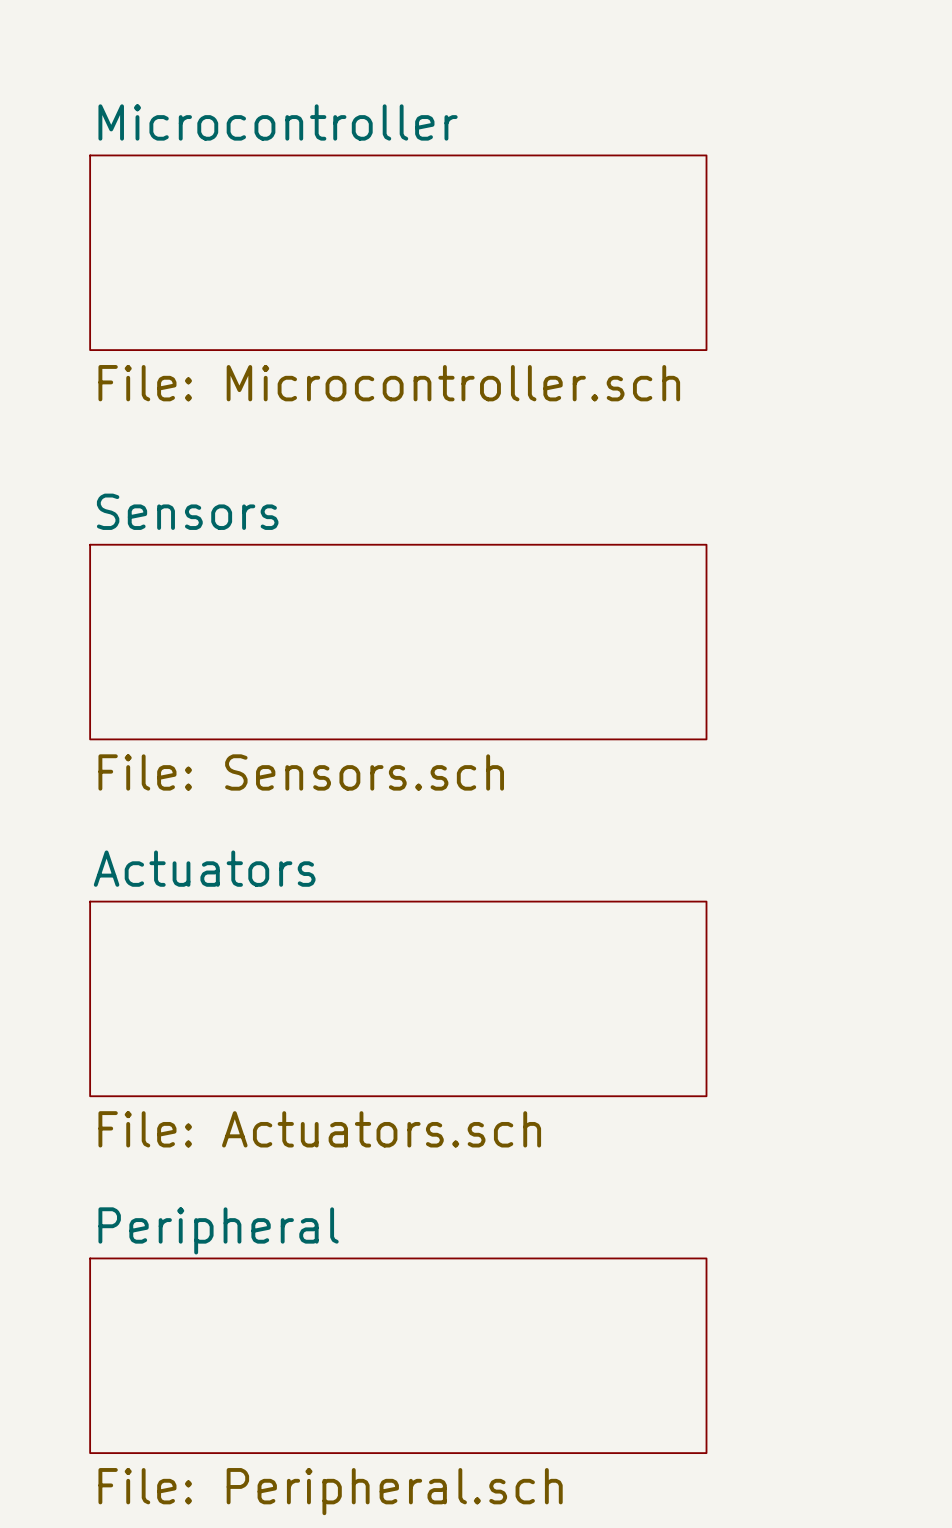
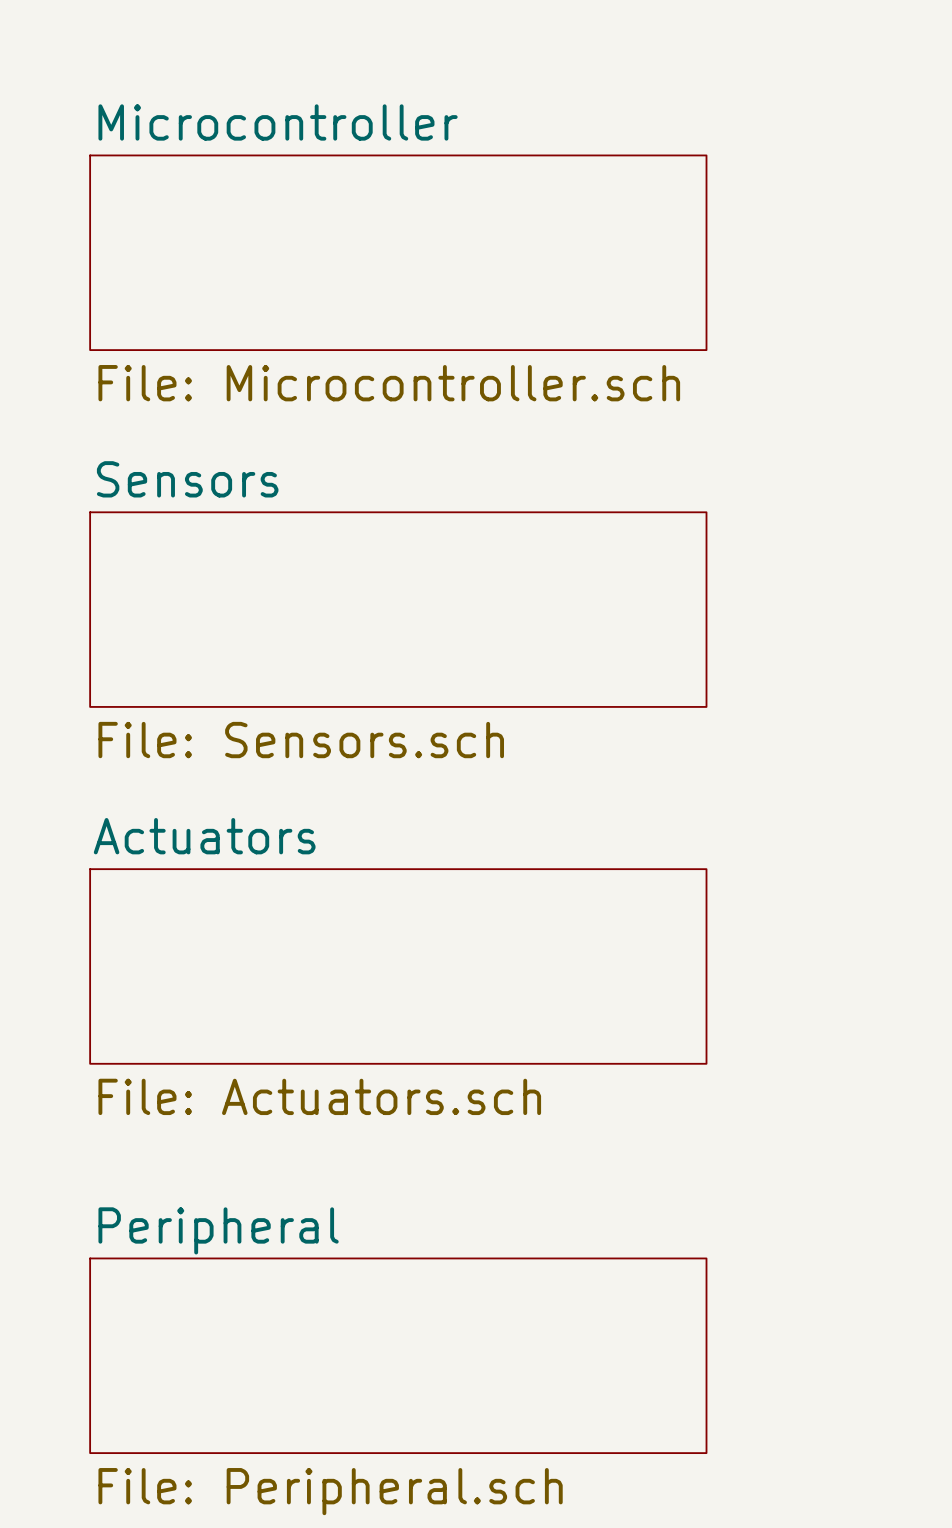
sheet Sensors position: (398, 642) -> (398, 609)
sheet Actuators position: (398, 998) -> (398, 966)

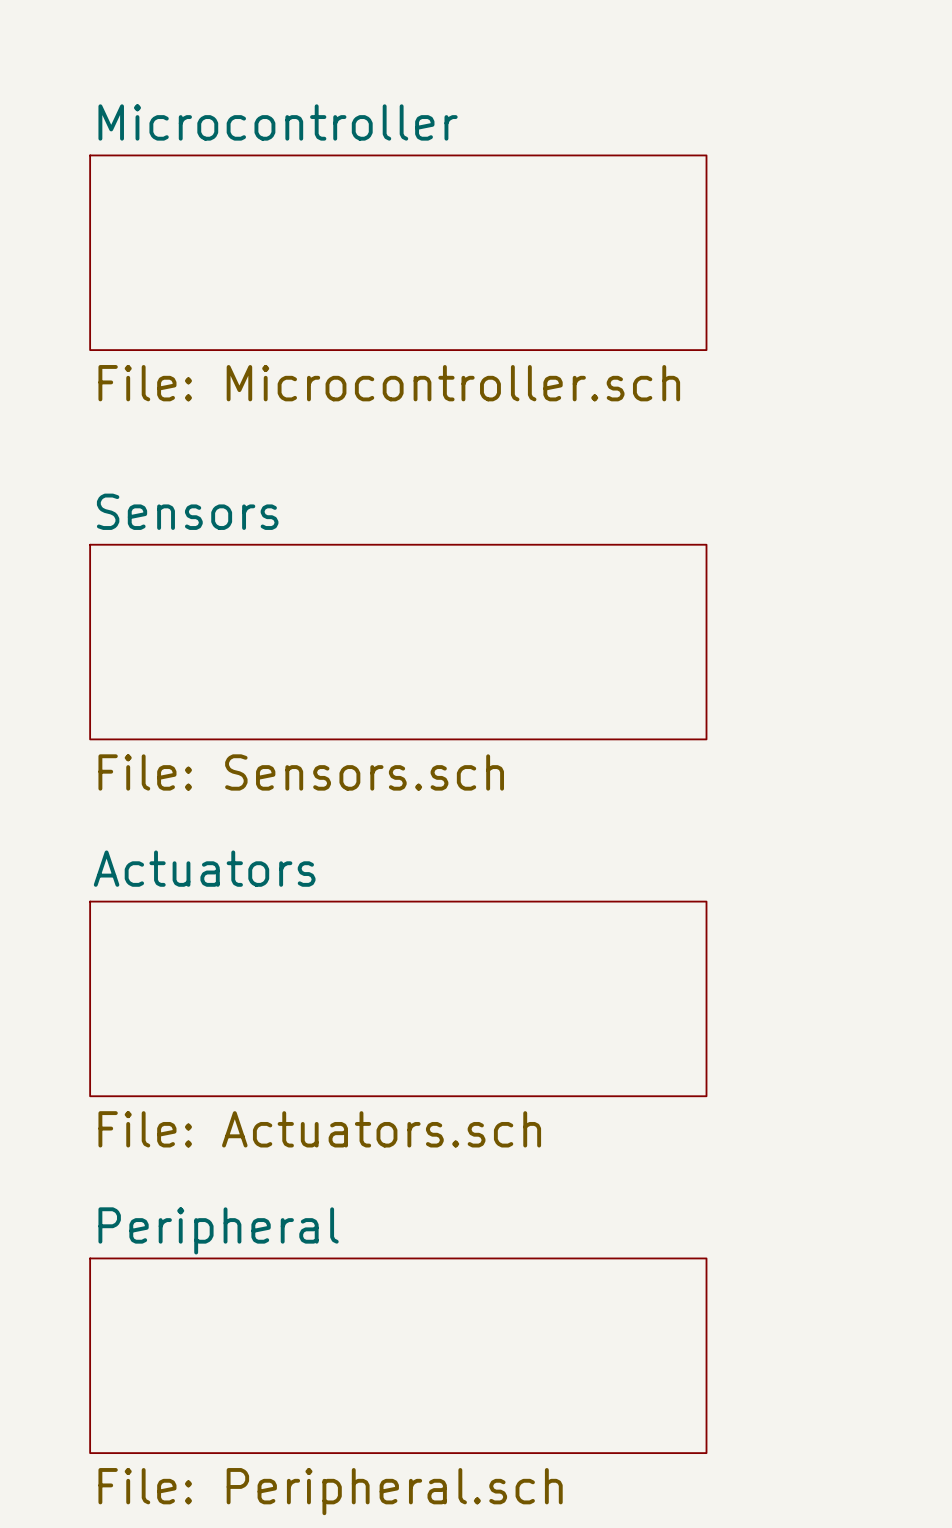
sheet Sensors position: (398, 609) -> (398, 642)
sheet Actuators position: (398, 966) -> (398, 998)

